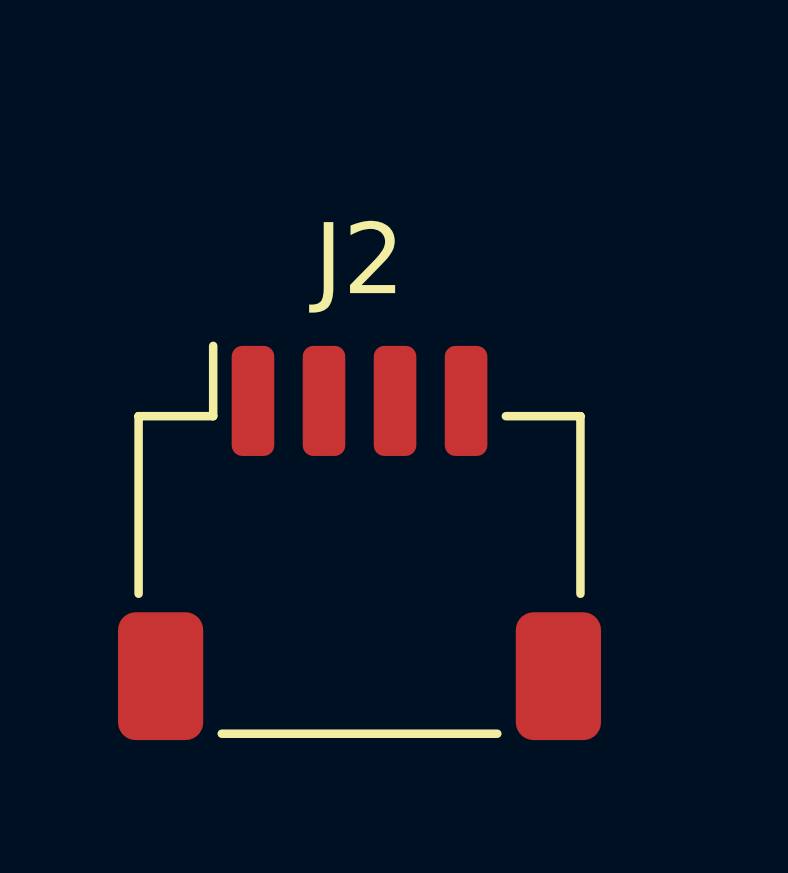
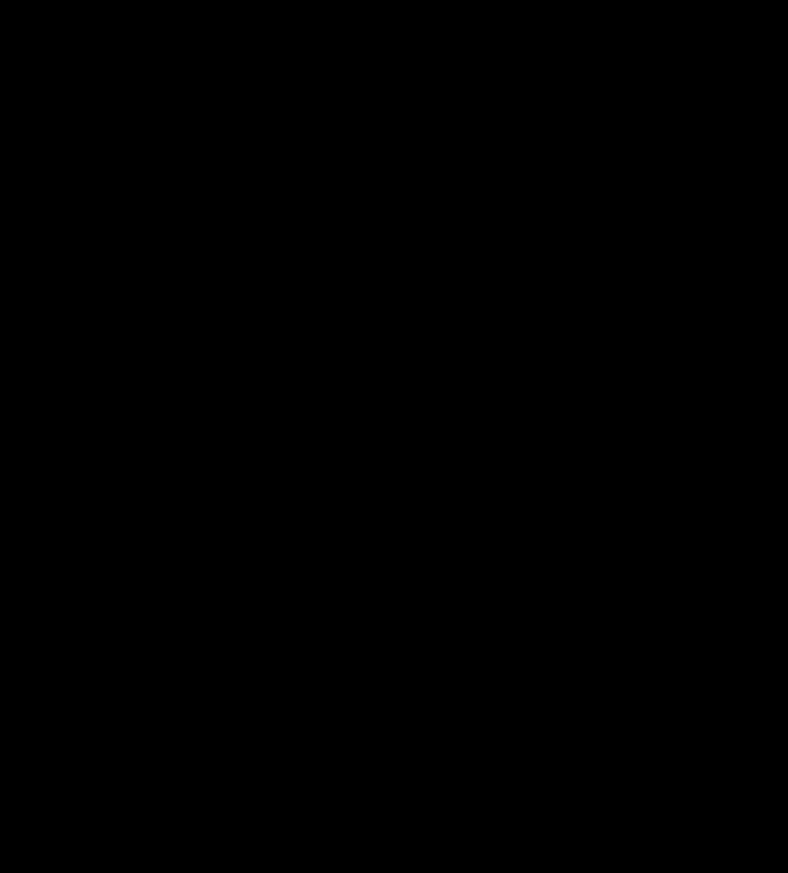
J2: (359, 540) -> none

